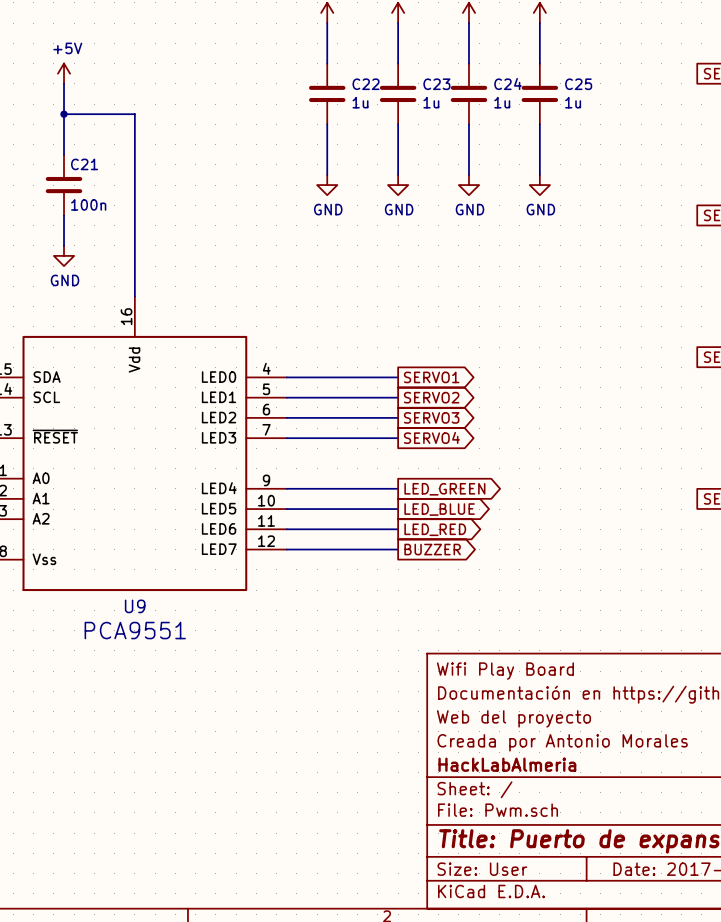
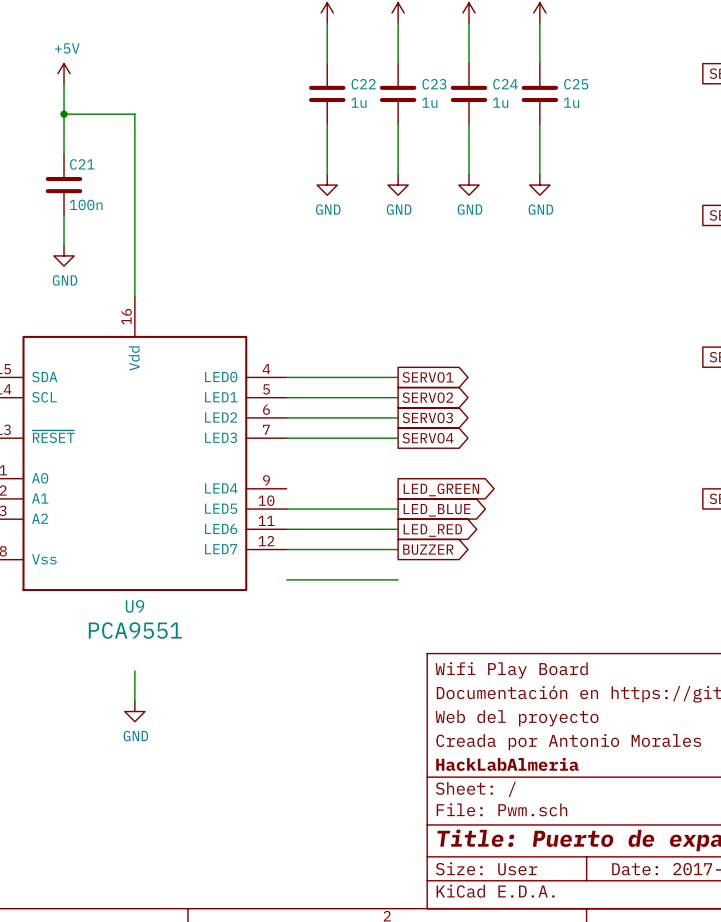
wire: (286, 488) (398, 488) -> (286, 579) (398, 579)
wire: none -> (134, 671) (134, 701)
power symbol: none -> GND (134, 711)

